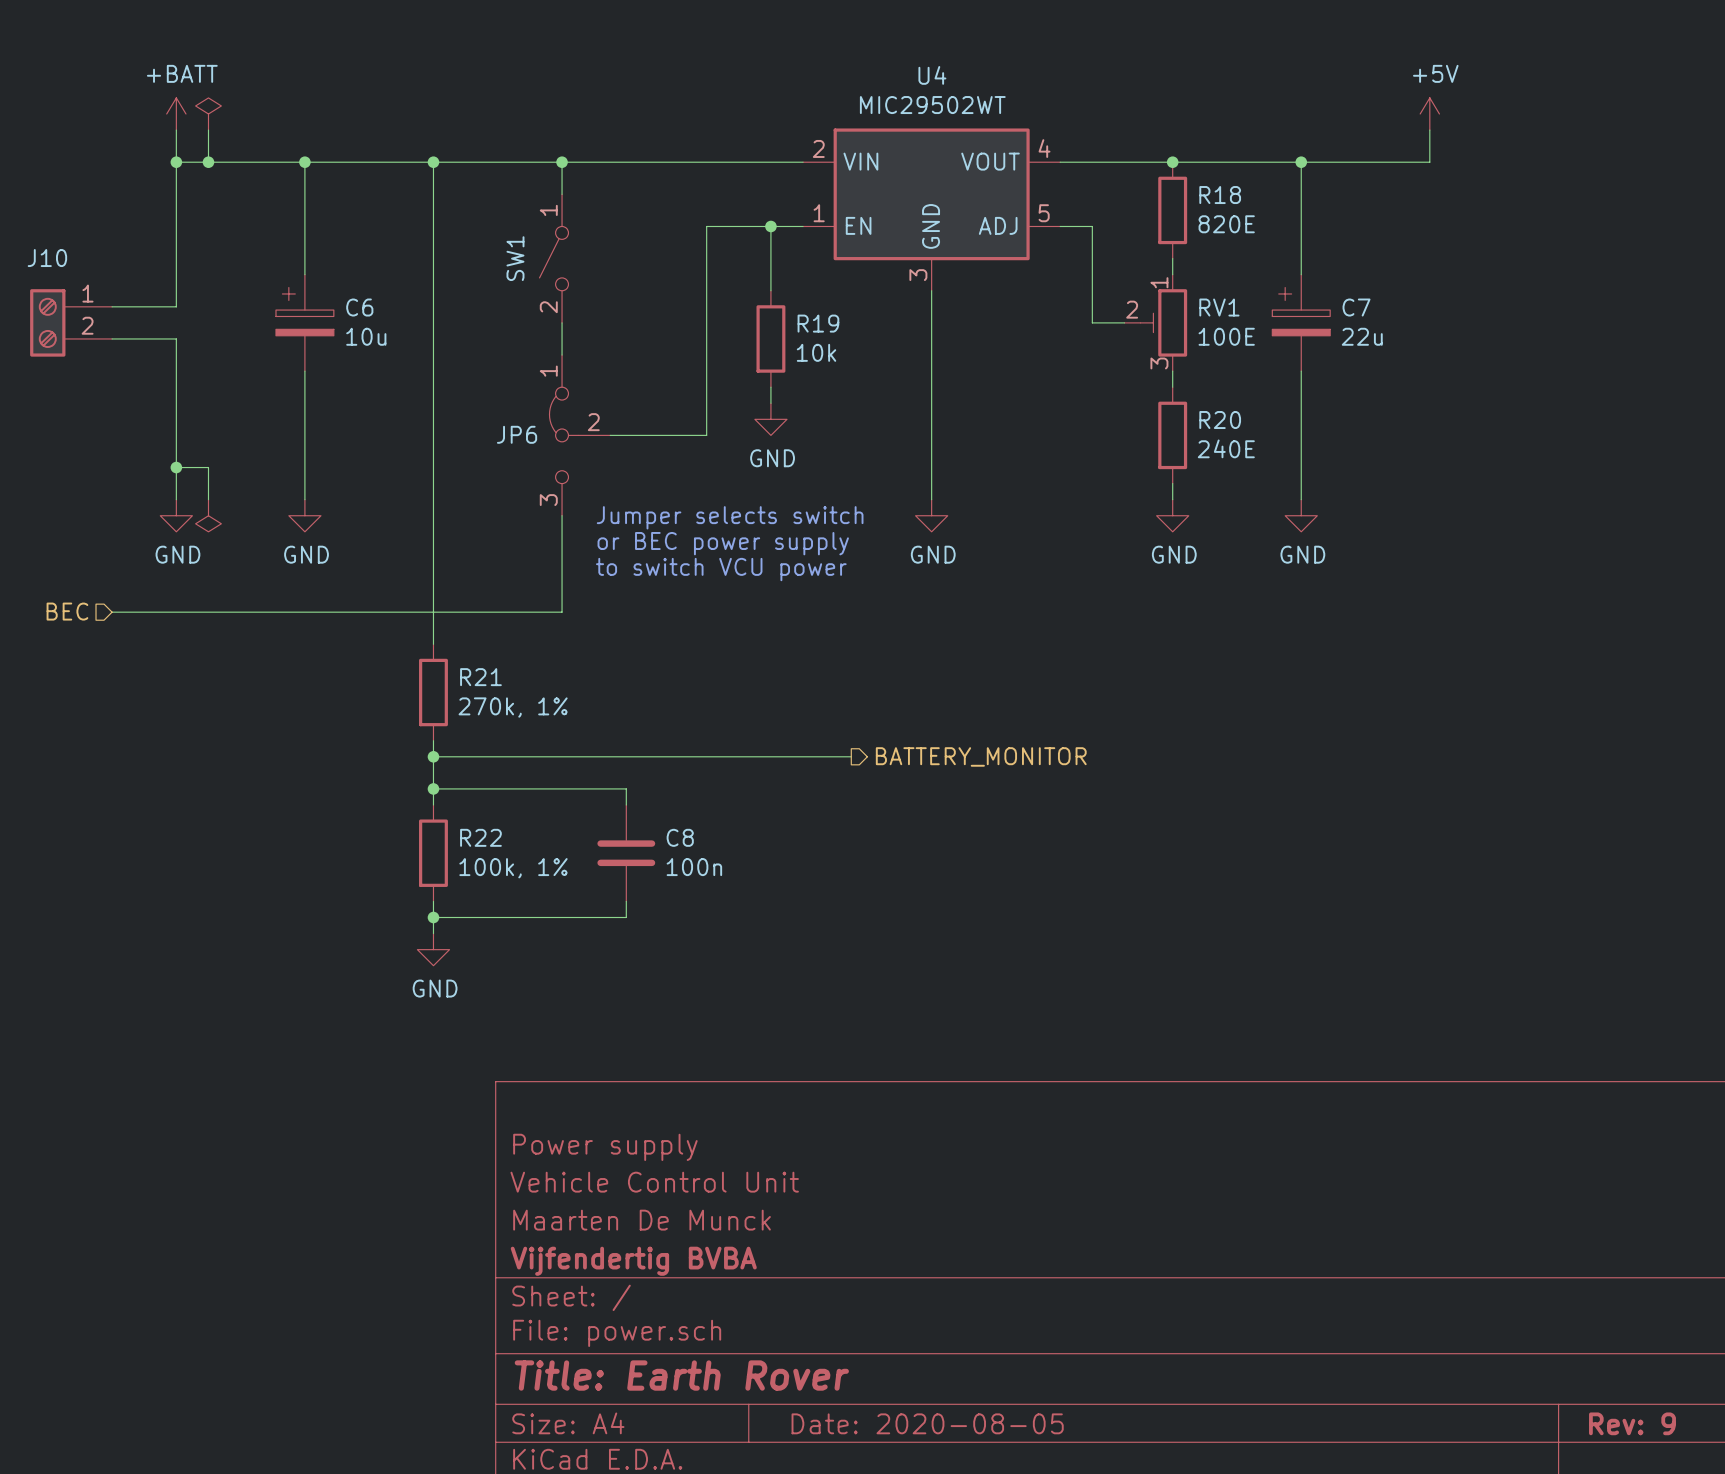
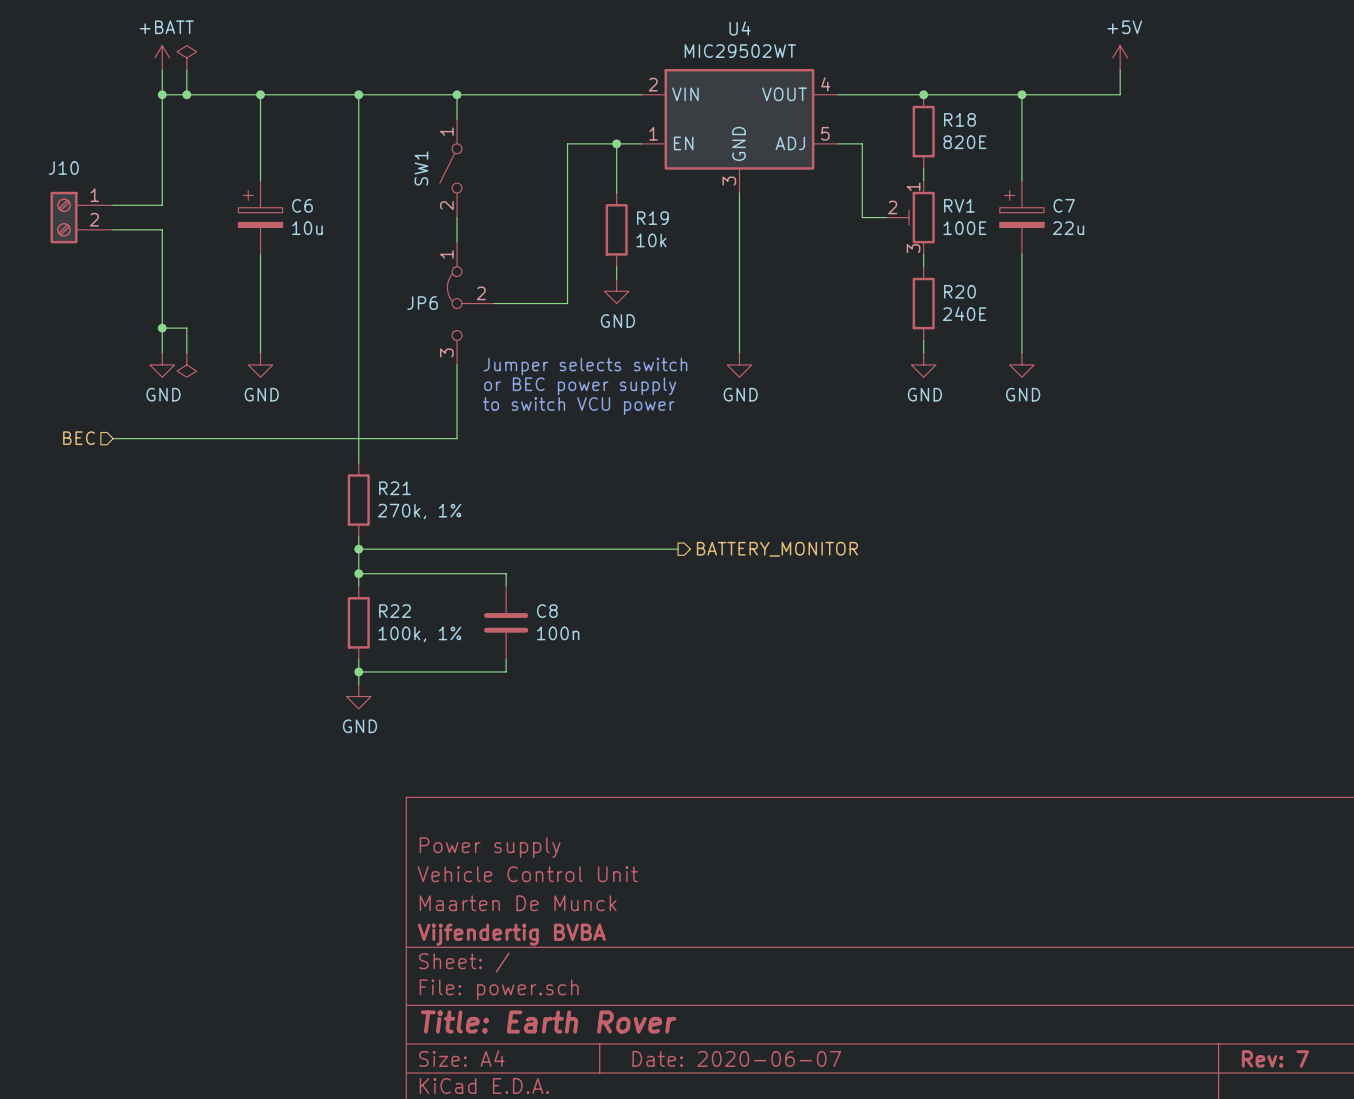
title block: Date: 2020-08-05 (927, 1423) -> Date: 2020-06-07 (736, 1058)
title block: Rev: 9 (1632, 1423) -> Rev: 7 (1275, 1058)

